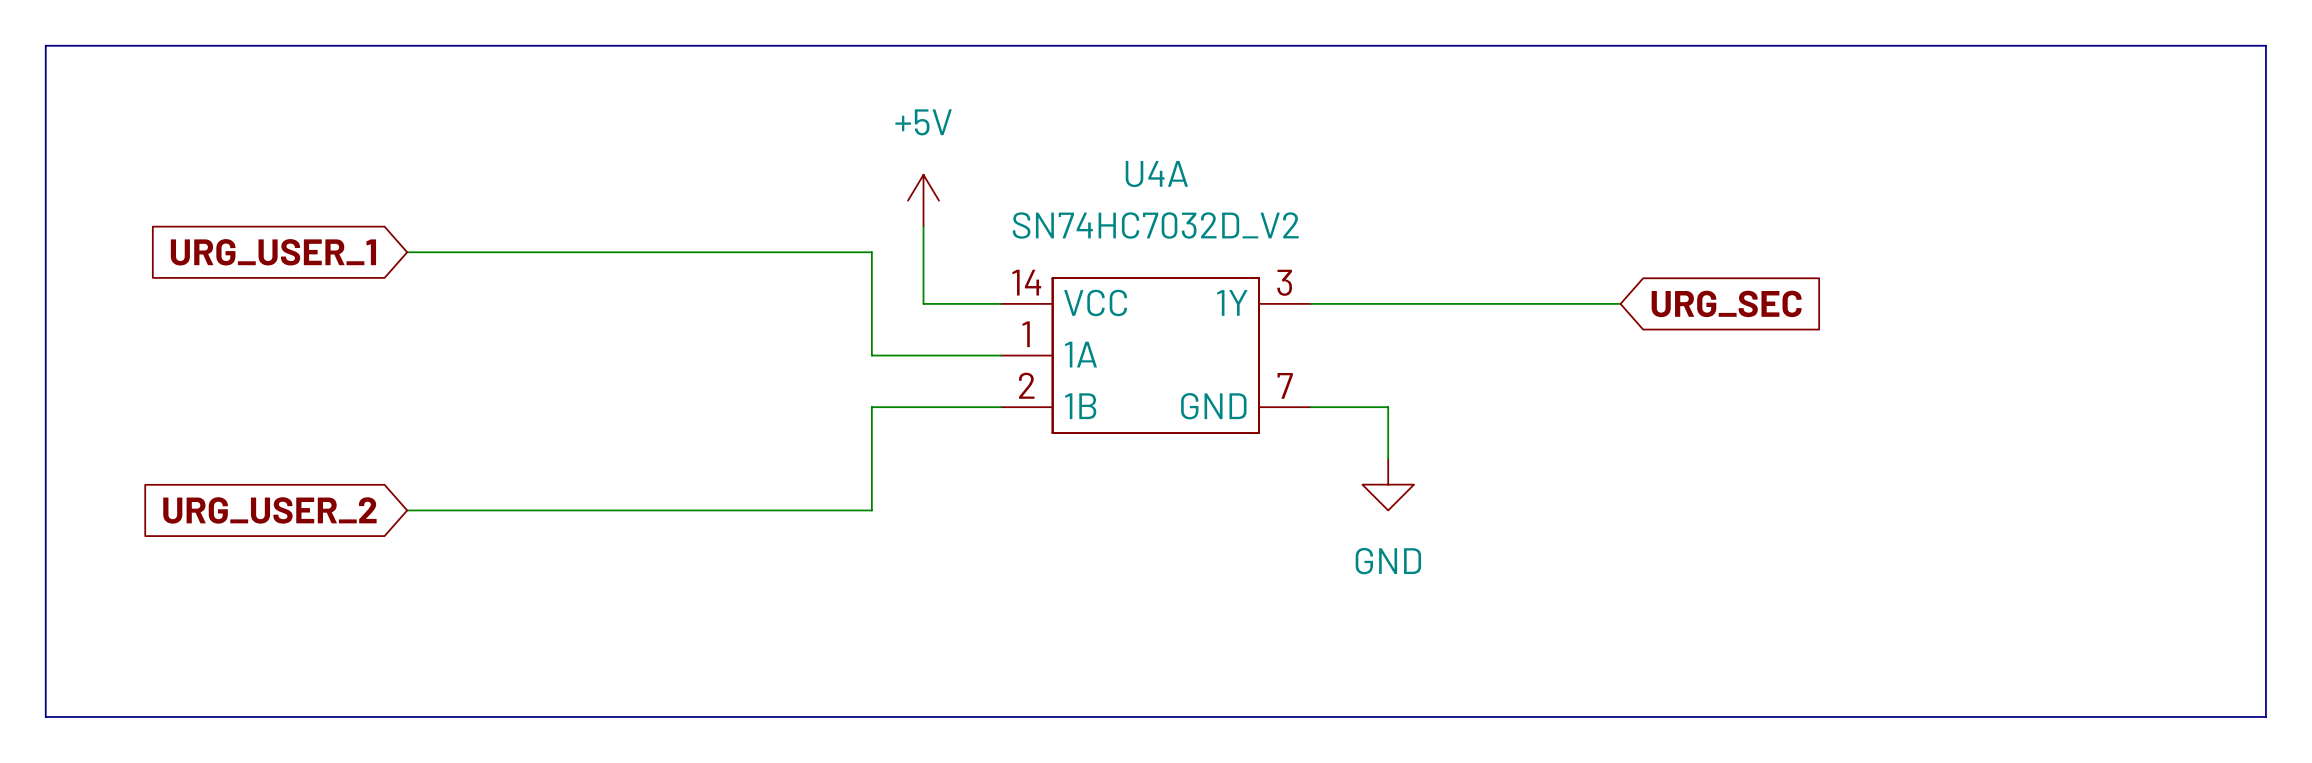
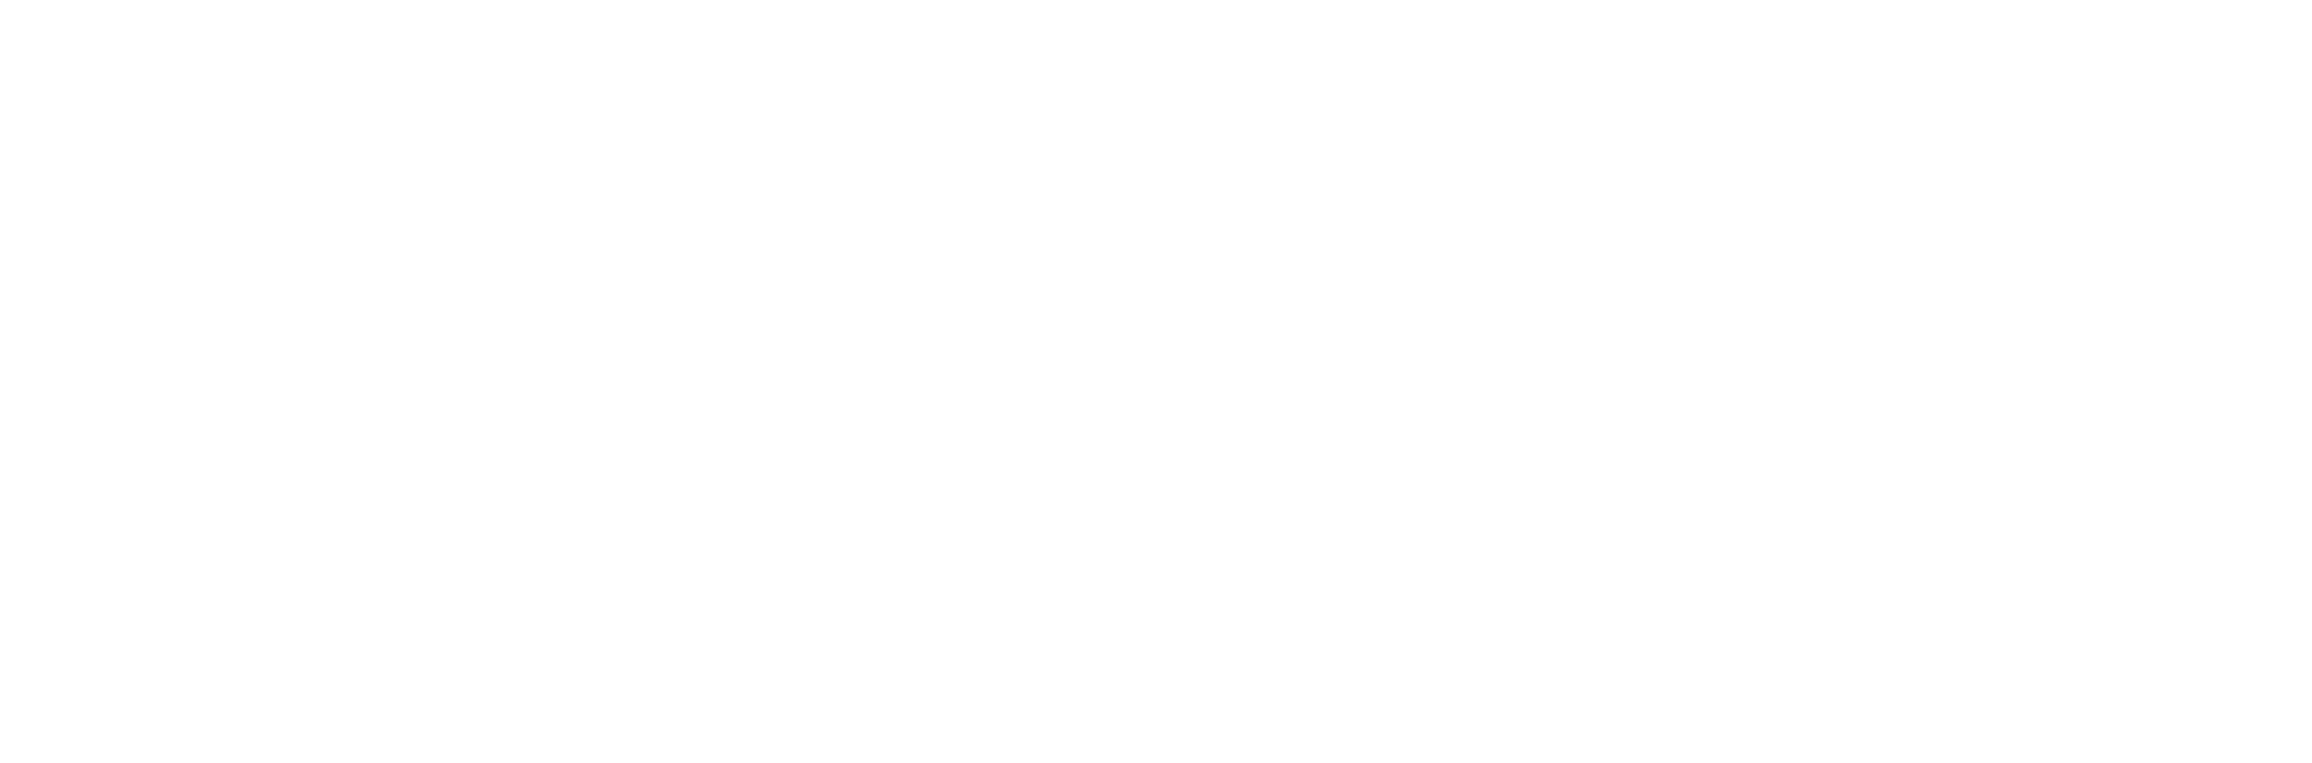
line: (45, 45) (2265, 45) (2265, 716) (45, 716) (45, 45) -> none
power symbol: +5V (923, 200) -> none
wire: (923, 226) (923, 303) (1000, 303) -> none
global label: URG_USER_1 (273, 252) -> none
wire: (407, 252) (871, 252) (871, 355) (1000, 355) -> none
wire: (1310, 303) (1620, 303) -> none
global label: URG_SEC (1726, 303) -> none
U4A: SN74HC7032D_V2 (1155, 355) -> none
wire: (1000, 407) (871, 407) (871, 510) (407, 510) -> none
wire: (1310, 407) (1388, 407) (1388, 458) -> none
power symbol: GND (1388, 484) -> none
global label: URG_USER_2 (269, 510) -> none

